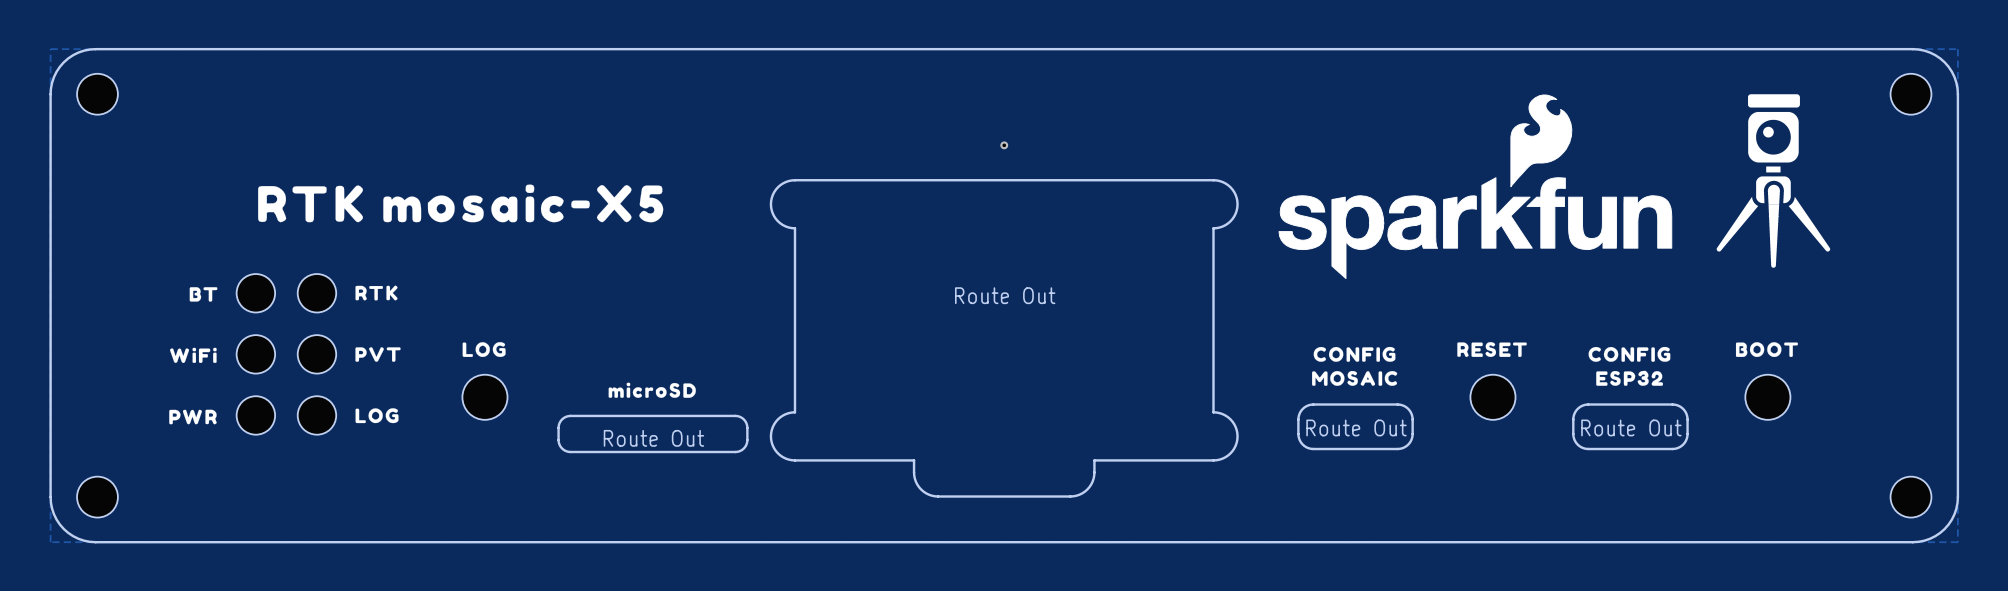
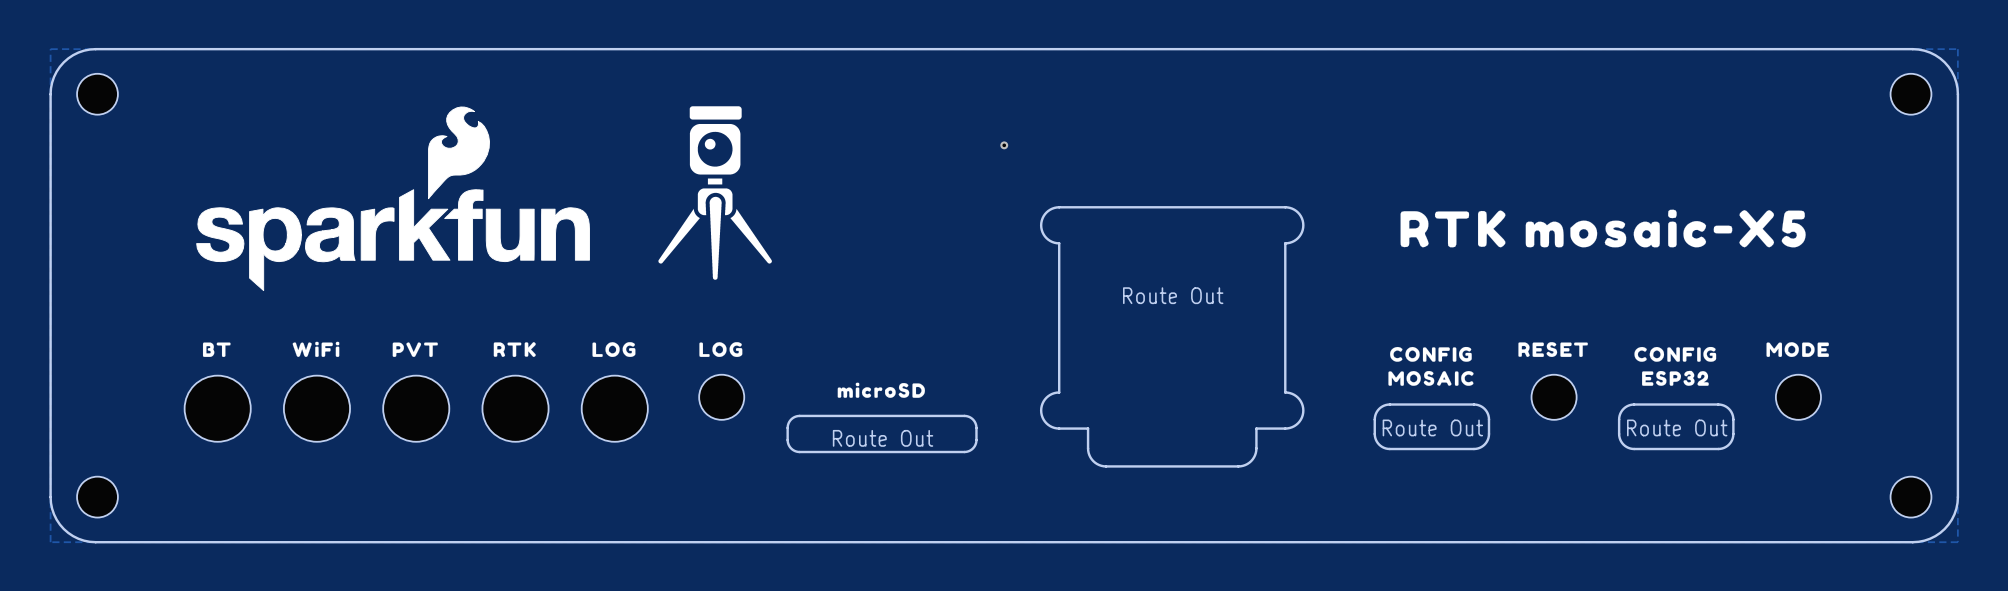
drawing: [1278, 94, 1673, 280] -> none
drawing: [1716, 94, 1831, 268] -> none
drawing: none -> [196, 106, 590, 292]
drawing: none -> [658, 106, 772, 280]
drawing: [769, 179, 1239, 498] -> none
drawing: [258, 184, 664, 223] -> none
drawing: none -> [1039, 206, 1305, 468]
drawing: none -> [1400, 209, 1806, 248]
drawing position: (376, 293) -> (514, 349)
drawing position: (203, 294) -> (216, 349)
drawing: [462, 342, 506, 357] -> none
drawing: none -> [592, 342, 636, 357]
drawing: none -> [699, 342, 743, 357]
drawing: [1735, 342, 1798, 357] -> none
drawing: none -> [1766, 342, 1829, 357]
drawing position: (1492, 349) -> (1553, 349)
part: (255, 354) -> none
part: (316, 354) -> none
drawing position: (377, 354) -> (415, 349)
drawing position: (1354, 354) -> (1430, 354)
drawing position: (1629, 354) -> (1675, 354)
drawing position: (193, 355) -> (316, 349)
drawing position: (1354, 378) -> (1430, 378)
drawing position: (1629, 378) -> (1675, 378)
drawing position: (652, 390) -> (881, 390)
part position: (484, 397) -> (721, 397)
part position: (1492, 397) -> (1554, 397)
part position: (1767, 397) -> (1798, 397)
part: none -> (217, 408)
part: none -> (316, 408)
drawing: [355, 408, 399, 424] -> none
part: none -> (416, 408)
part: none -> (515, 408)
part: none -> (614, 408)
drawing: [169, 409, 217, 425] -> none
drawing position: (1355, 426) -> (1431, 426)
drawing position: (1630, 426) -> (1676, 426)
drawing position: (652, 433) -> (882, 433)

